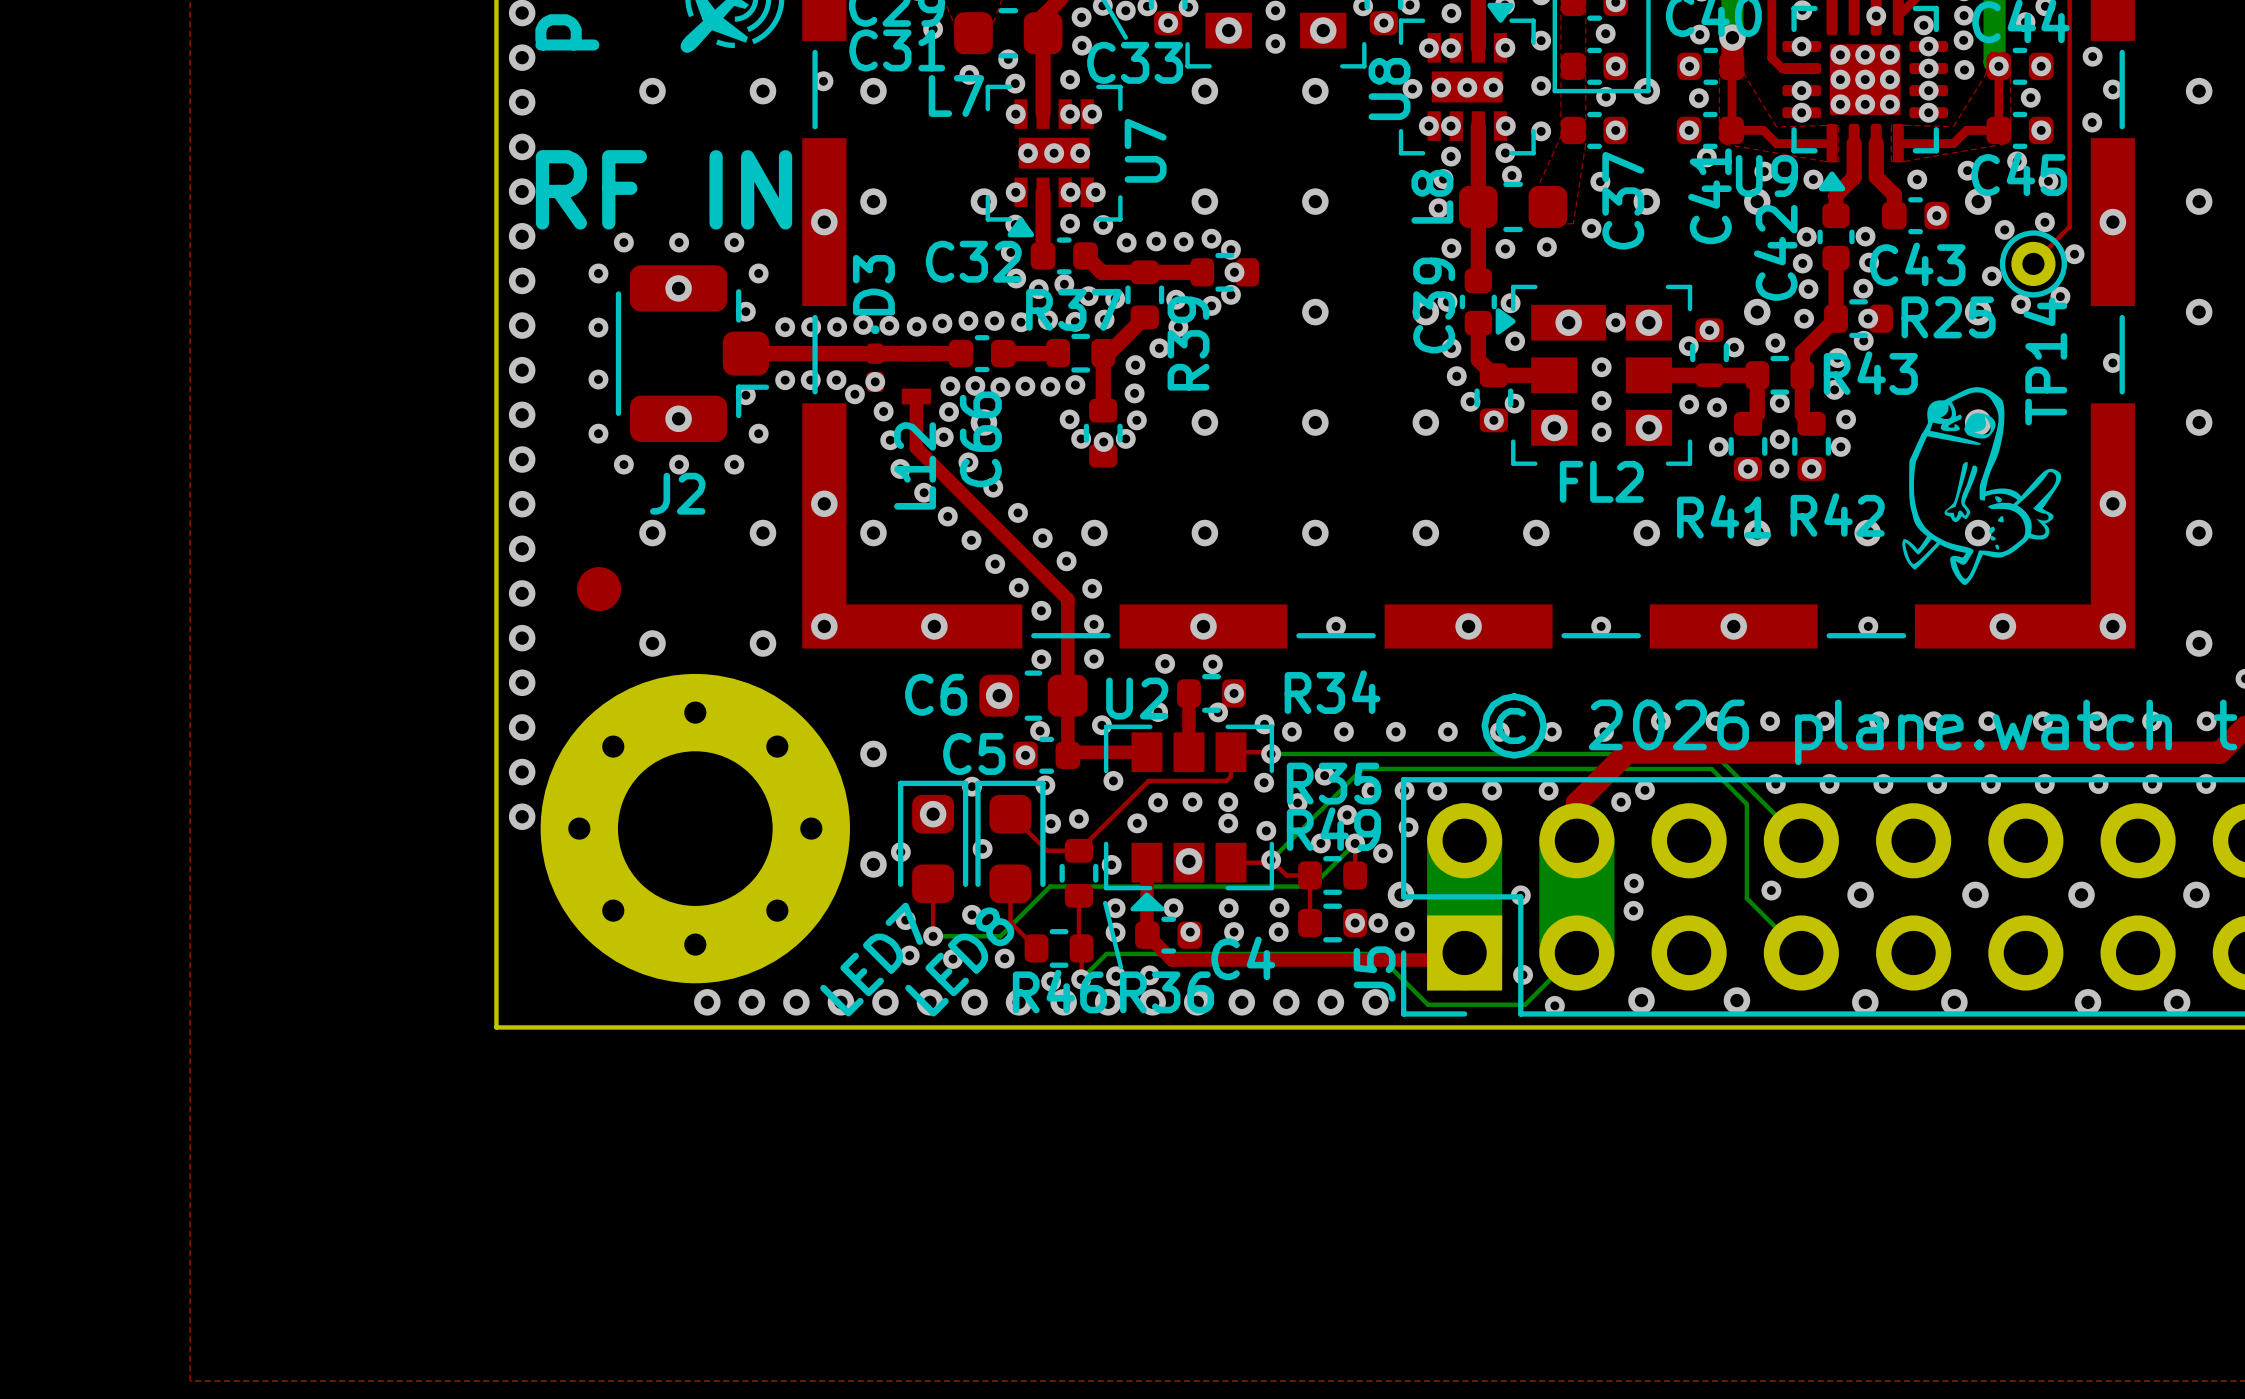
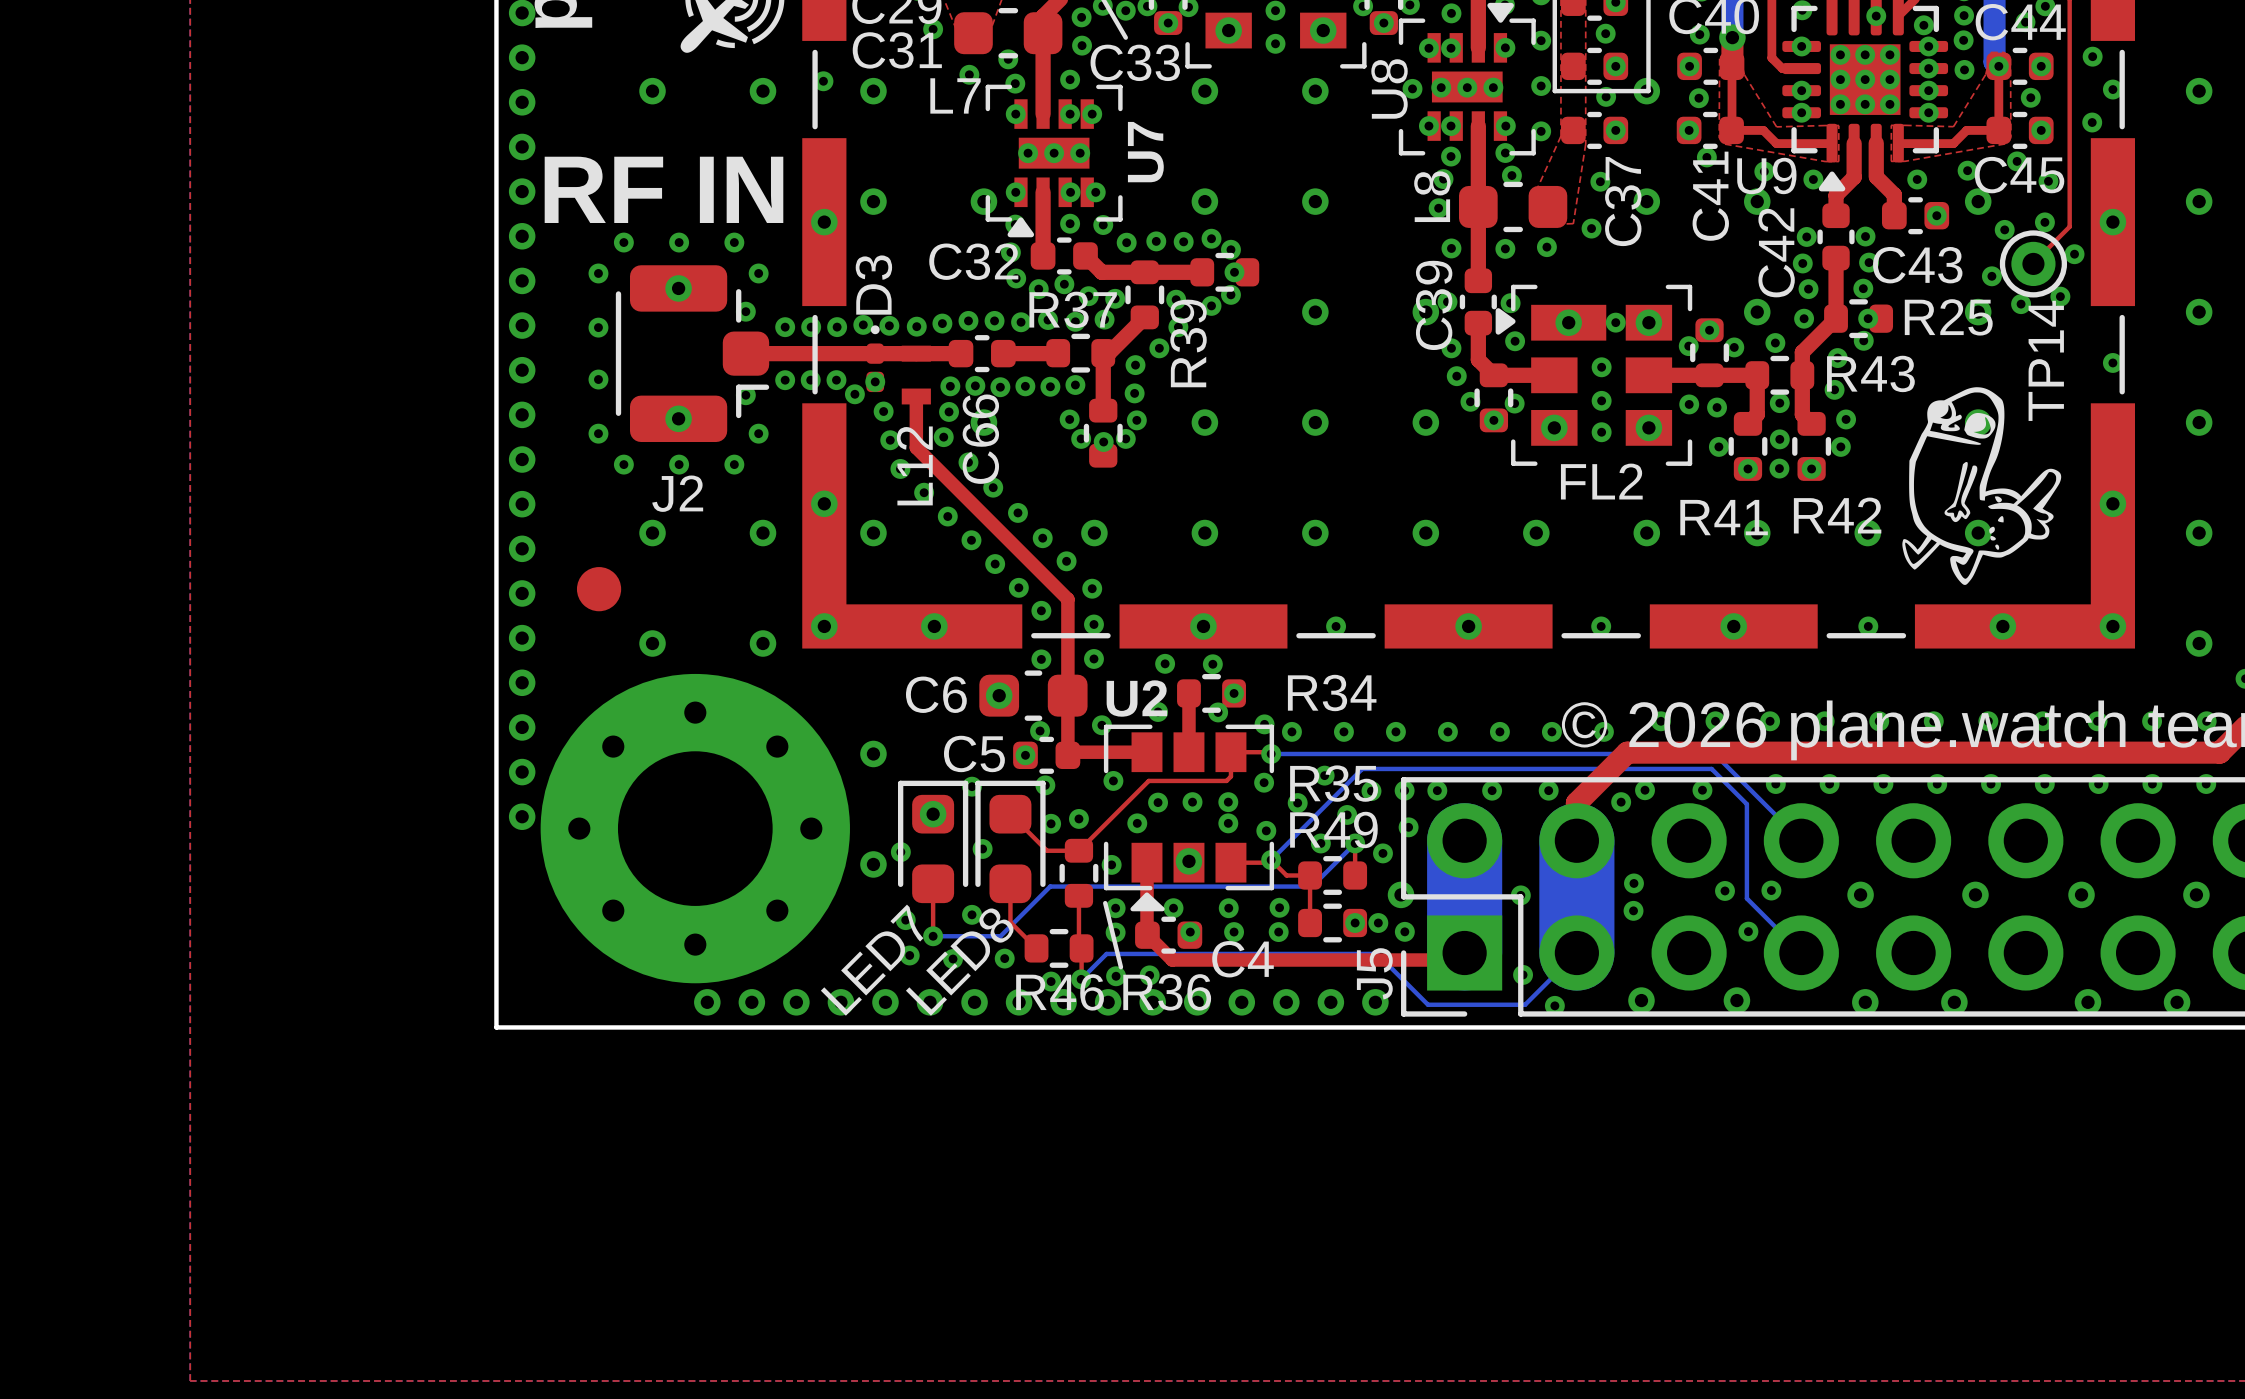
via: none -> (1702, 790)
via: none -> (1725, 890)
via: none -> (1748, 931)

